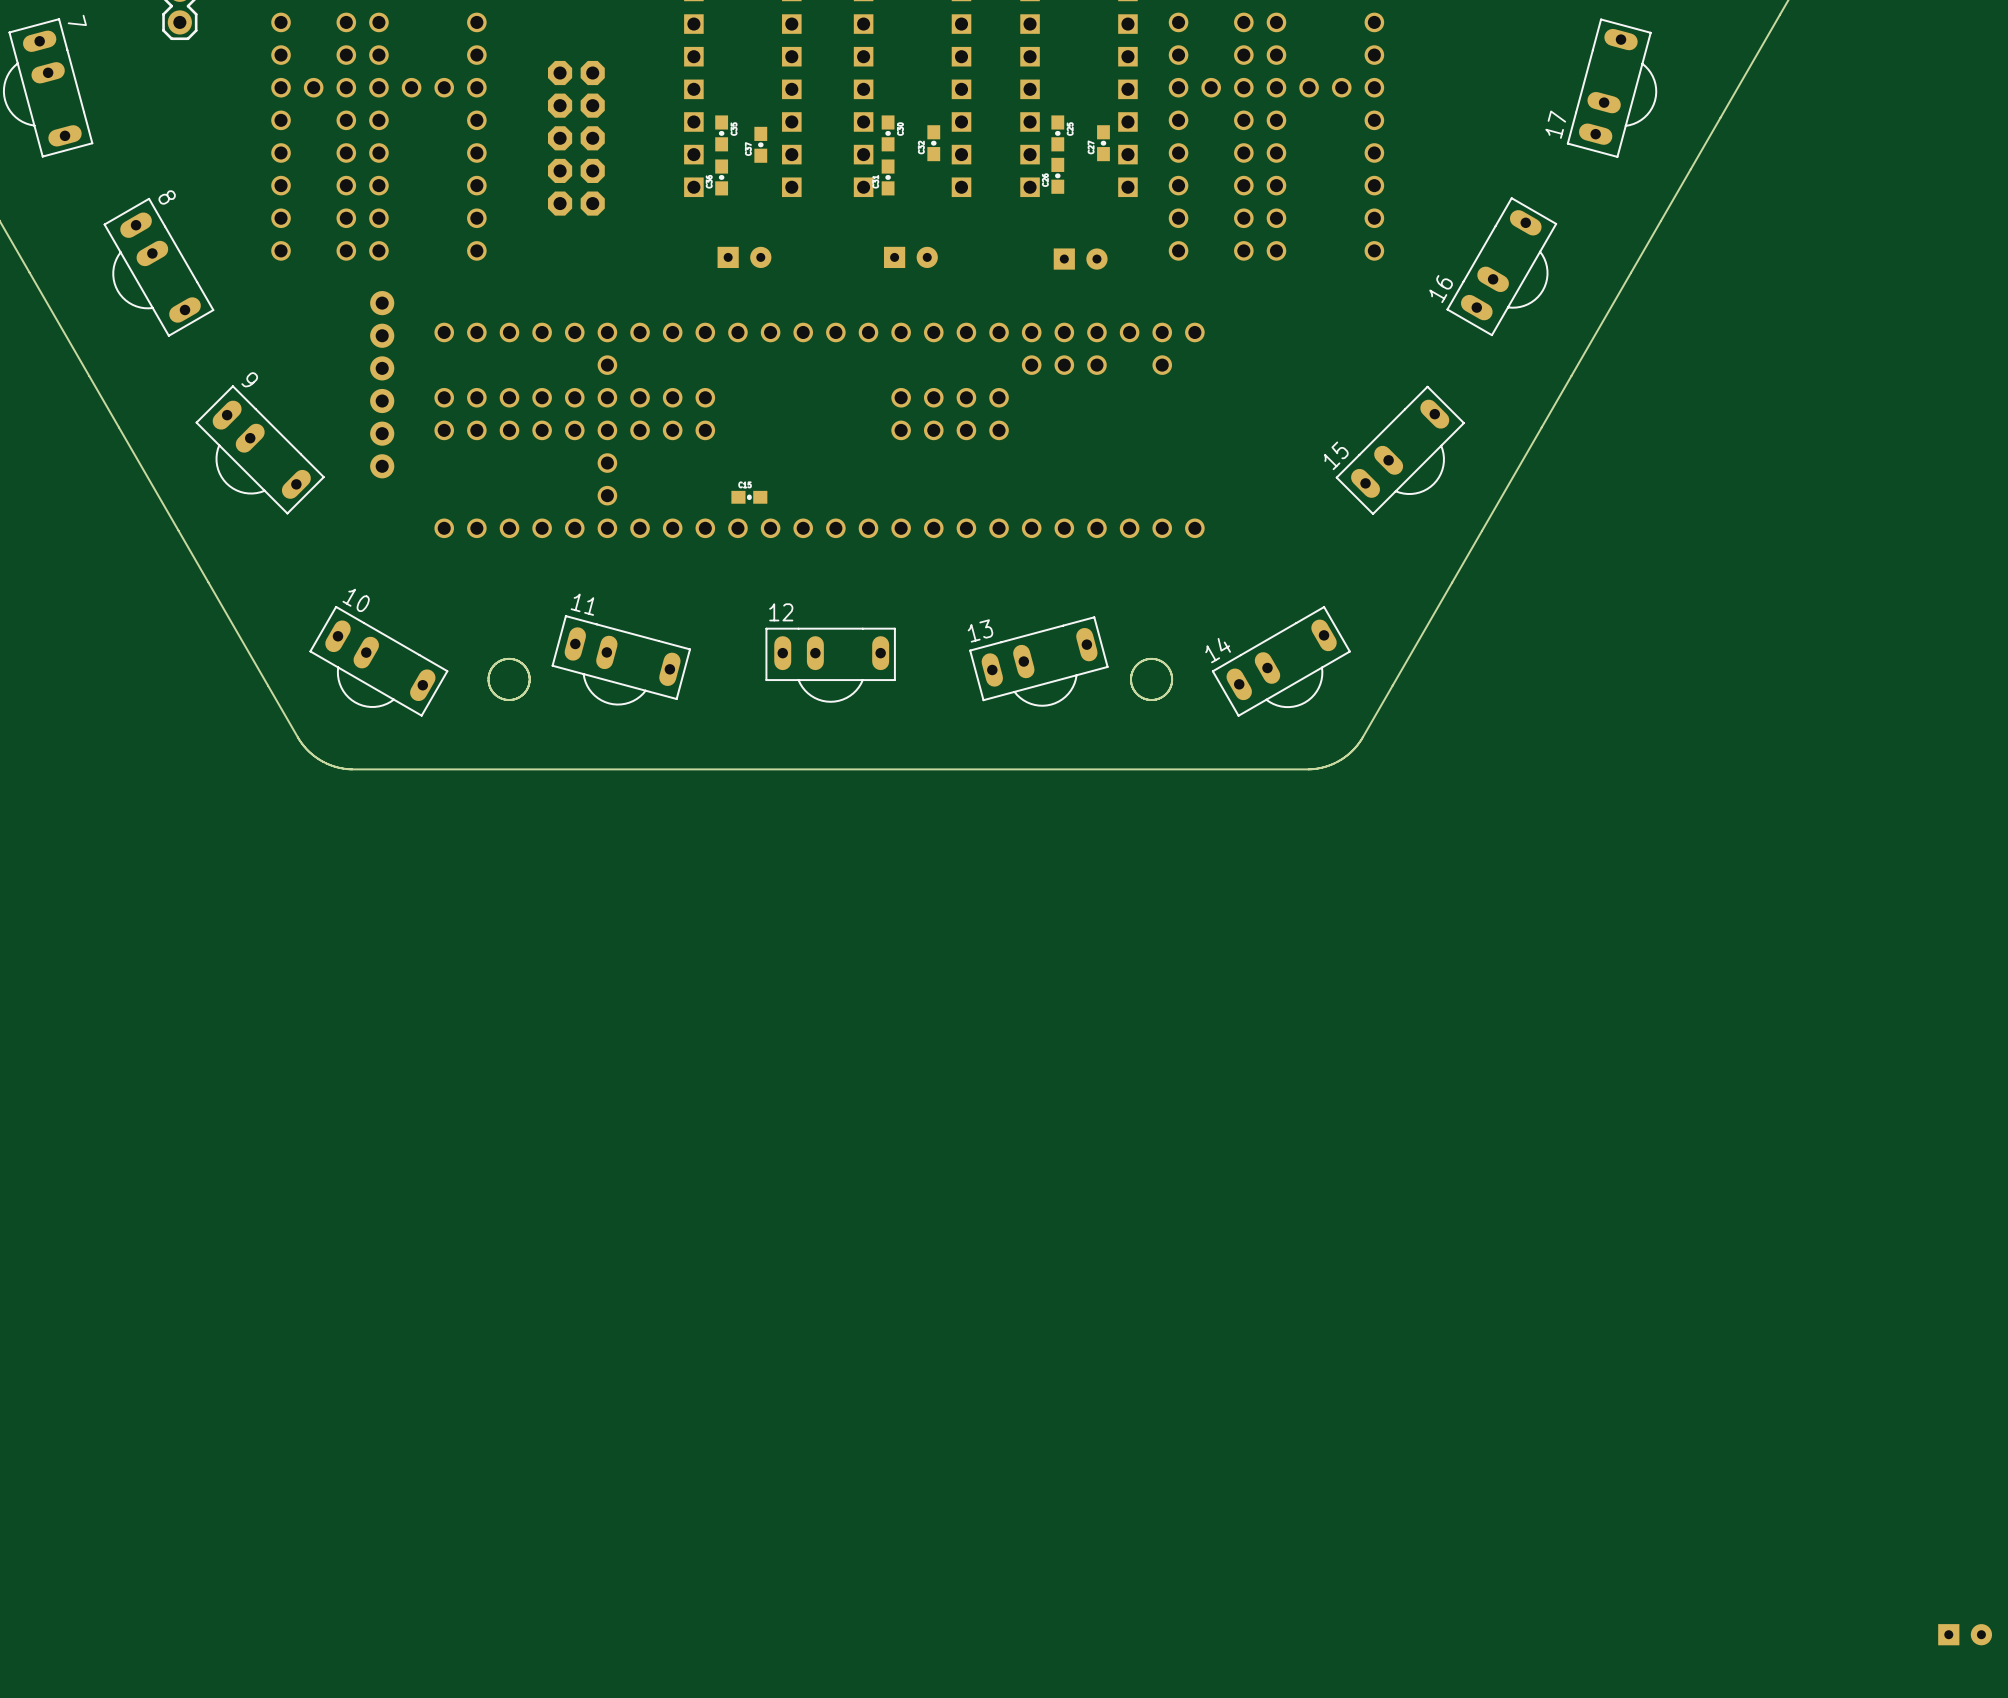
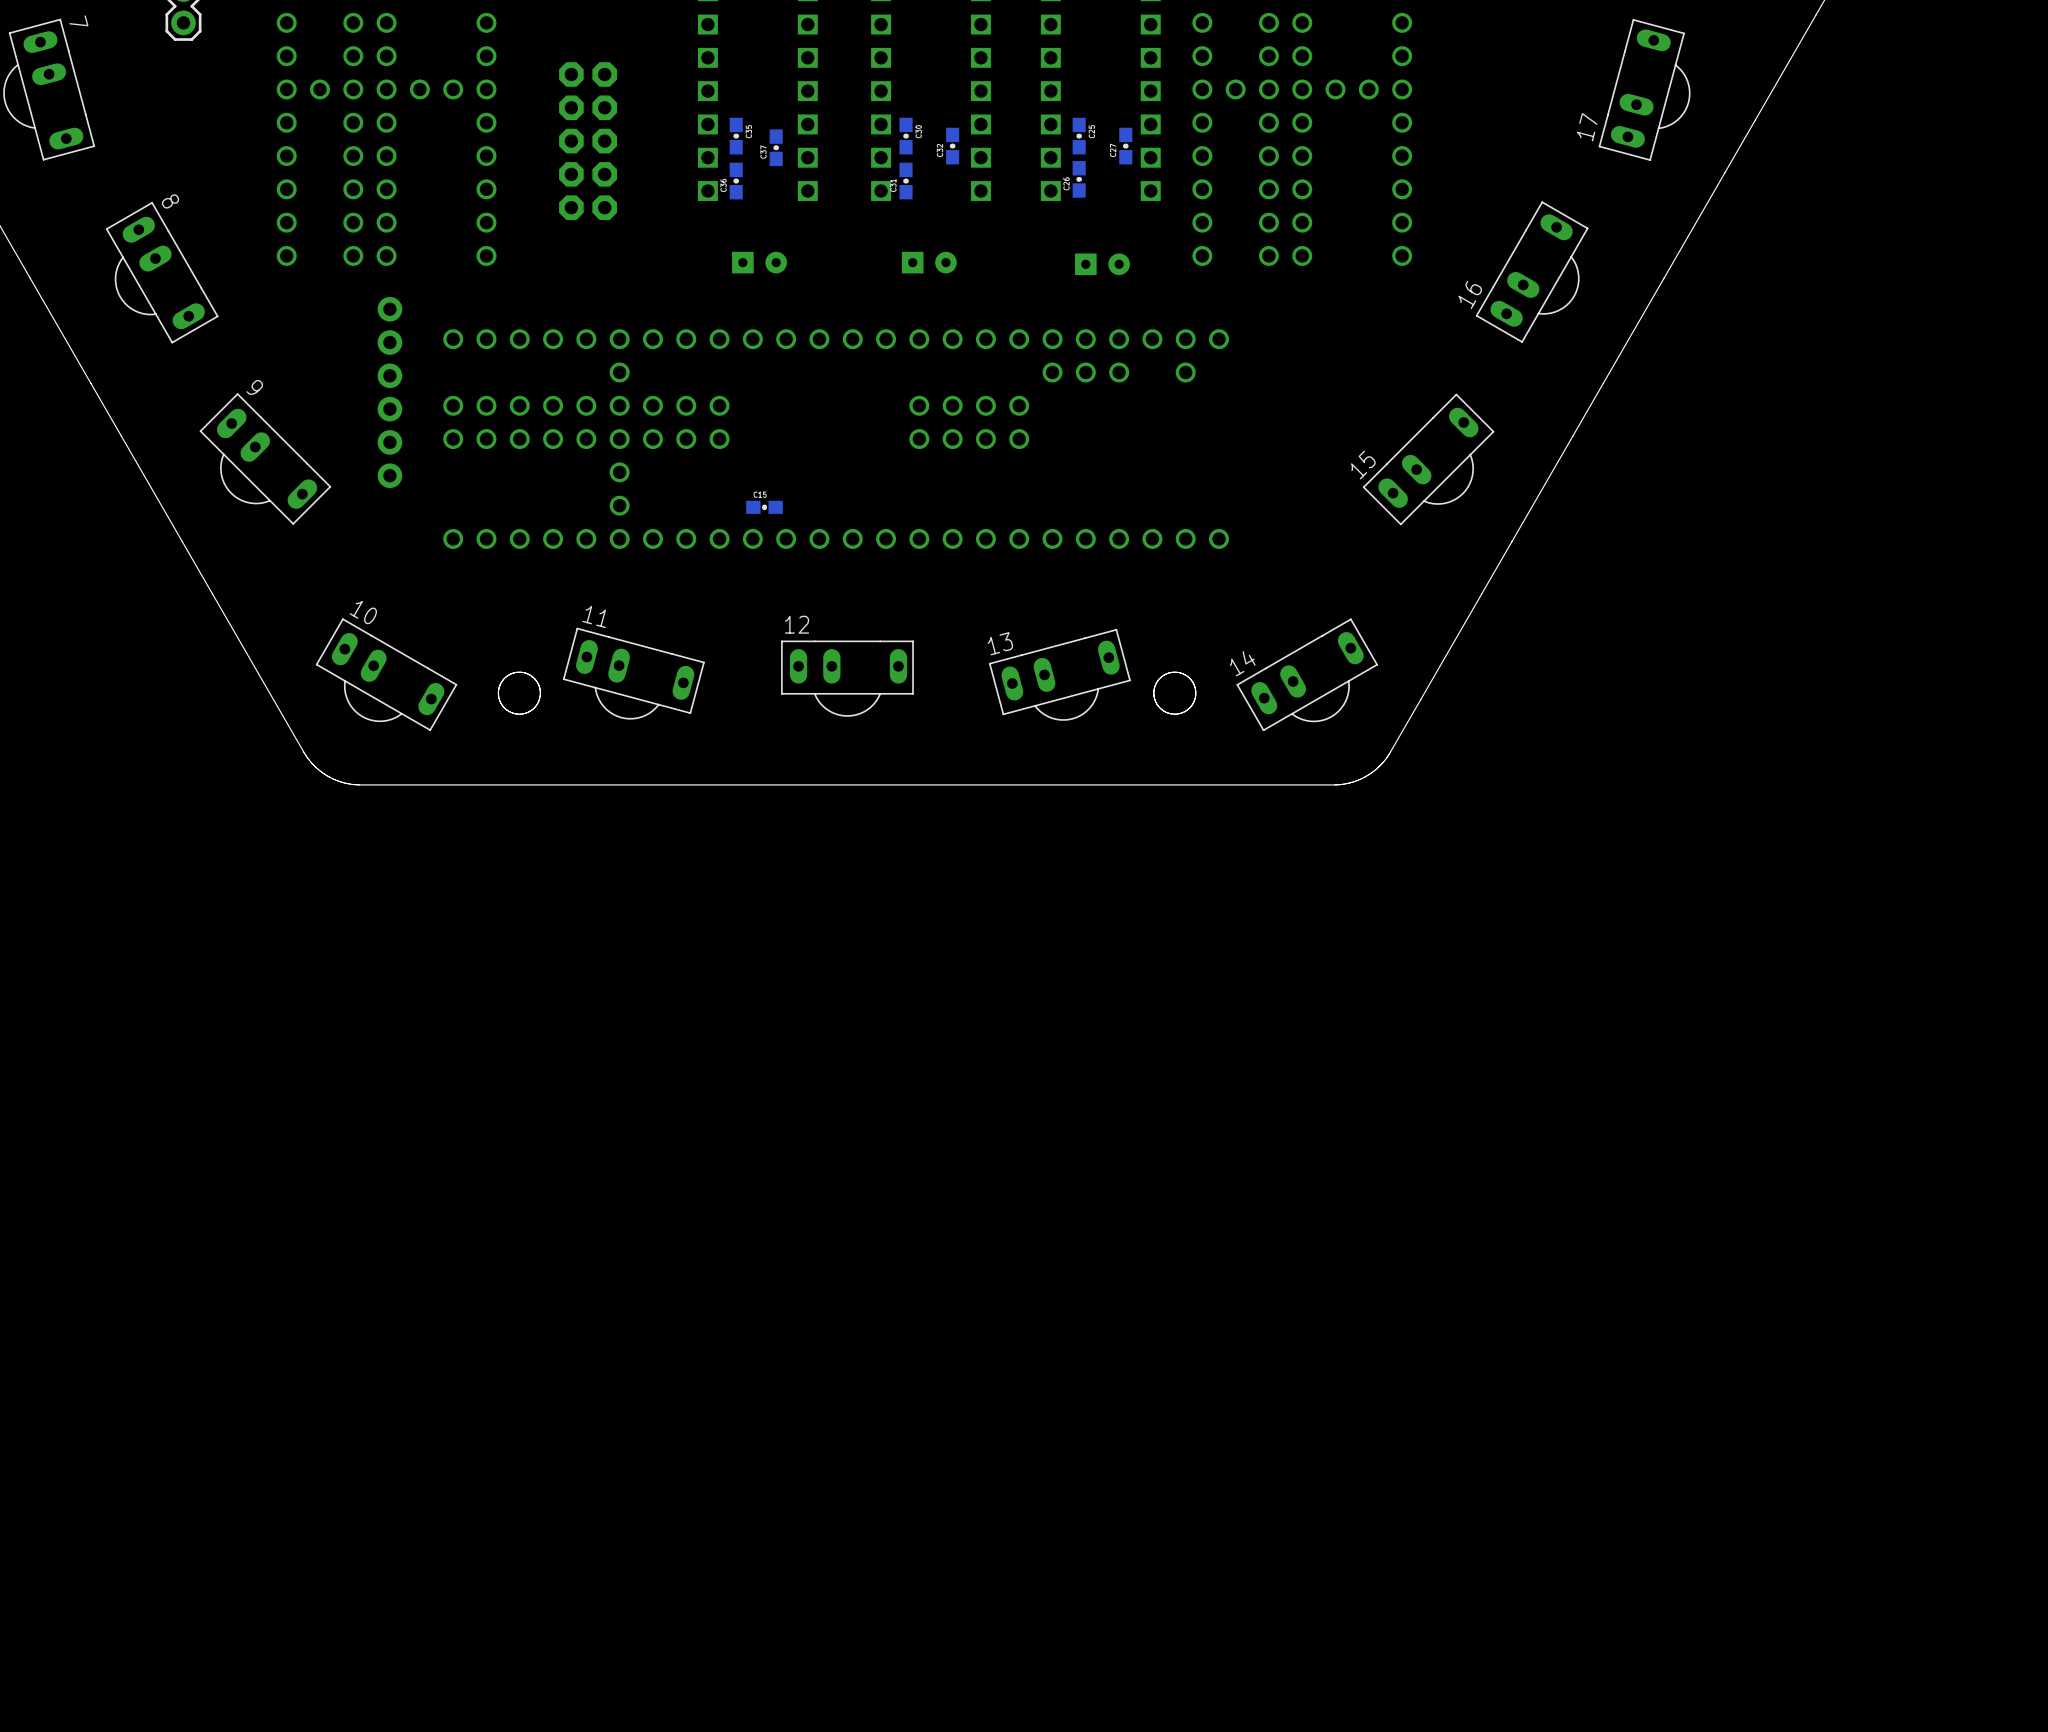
part: (1965, 1634) -> none

